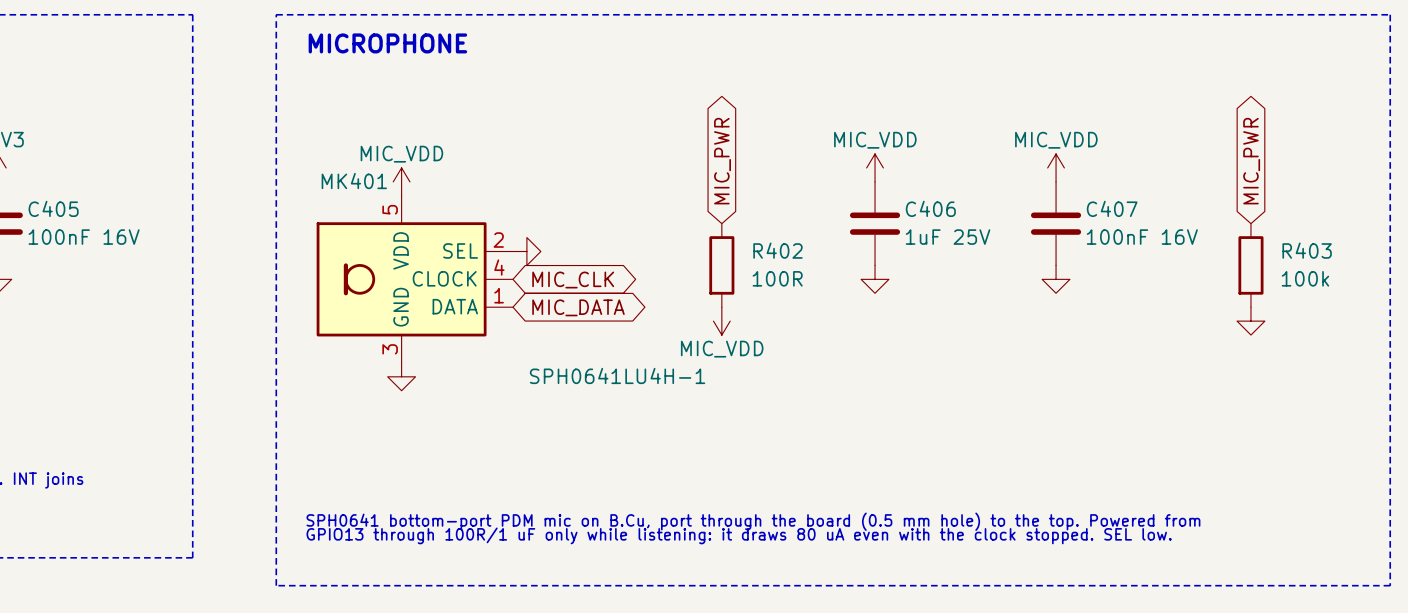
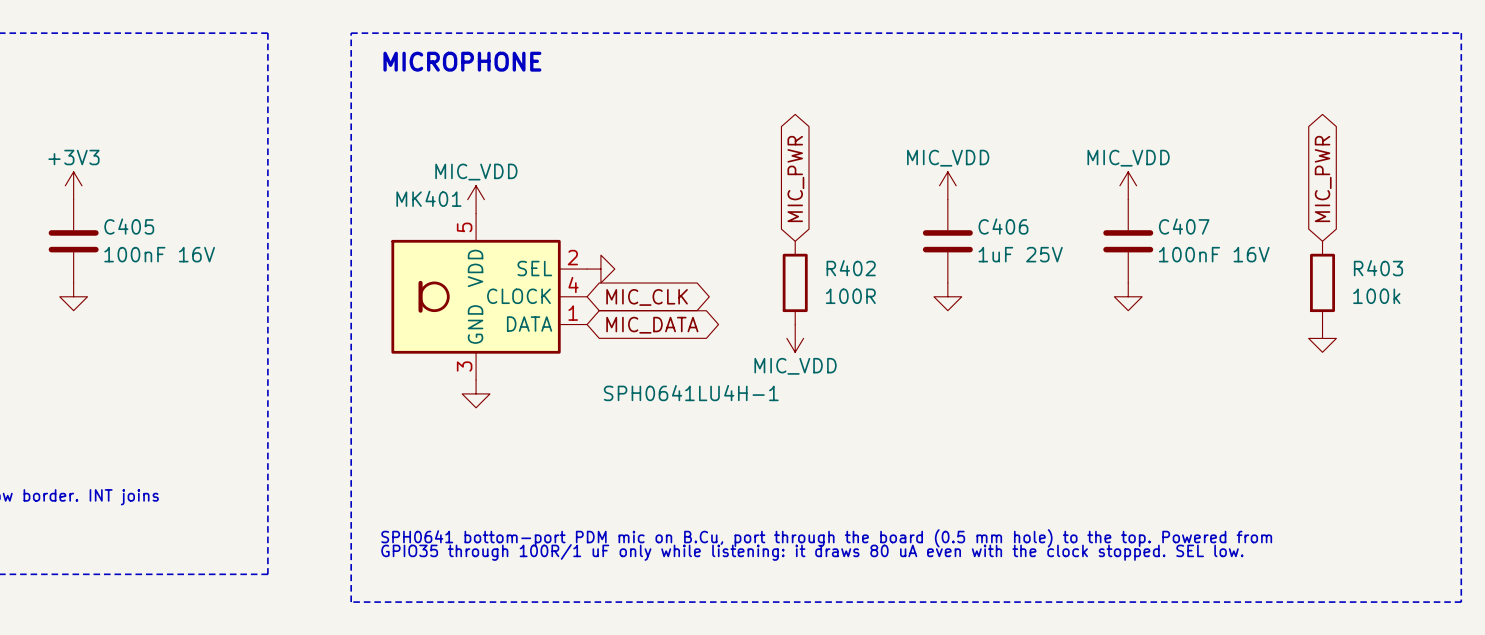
text: GPIO13 through 100R/1 uF only while listening: it draws 80 uA even with the clock stopped. SEL low. (739, 535) -> GPIO35 through 100R/1 uF only while listening: it draws 80 uA even with the clock stopped. SEL low. (812, 552)

